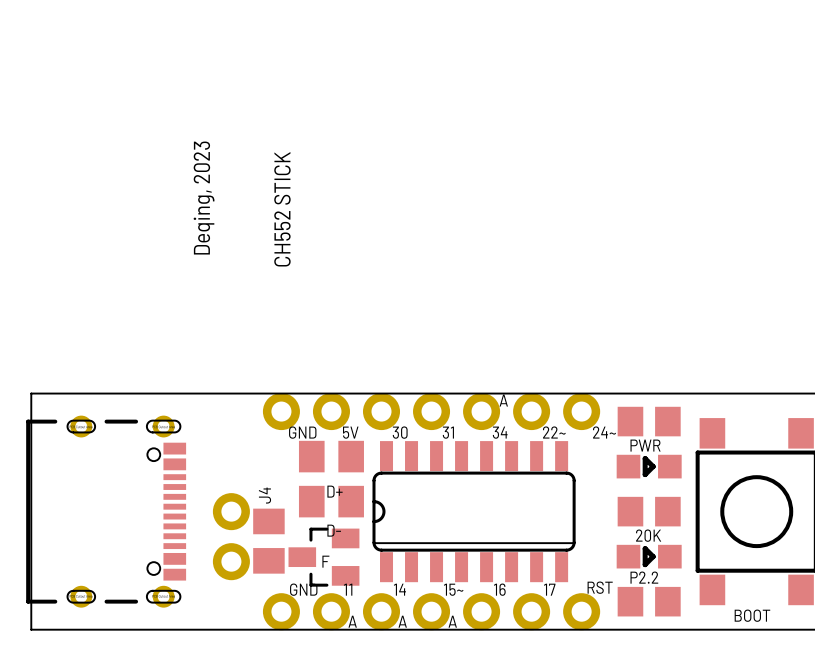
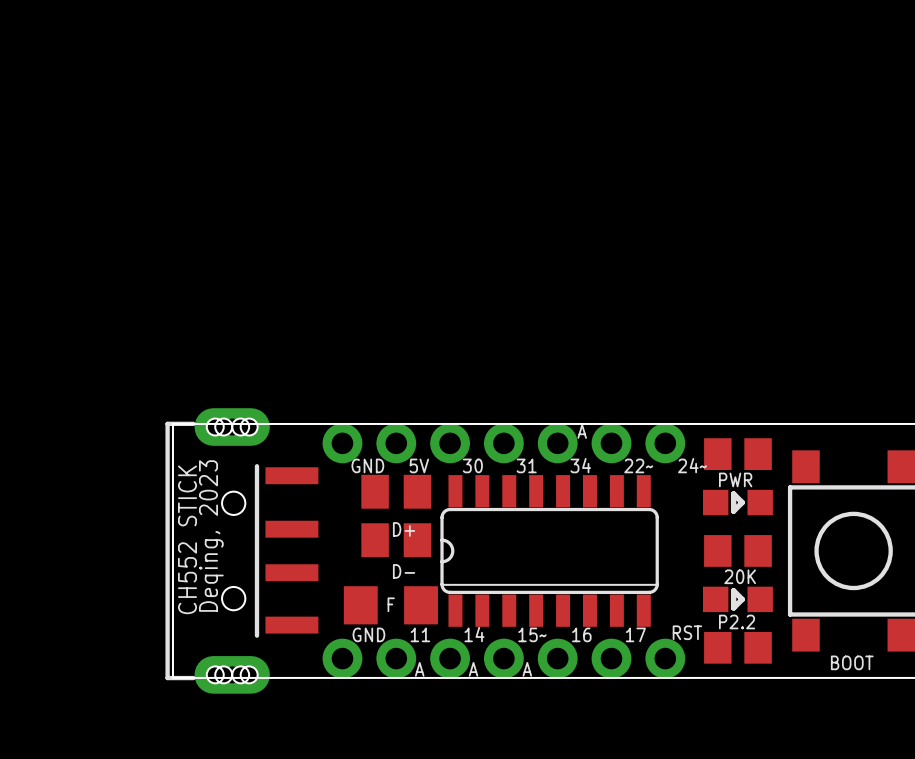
text position: Deqing, 2023 (204, 198) -> Deqing, 2023 (211, 536)
text position: CH552 STICK (282, 209) -> CH552 STICK (187, 539)
board edge: (123, 393) (31, 393) (31, 629) (123, 629) -> (172, 423) (172, 677)
part: (106, 511) -> none
part: none -> (241, 550)
part footprint: [288, 527, 360, 587] -> [343, 586, 438, 625]
J4: (231, 536) -> none
part: (268, 541) -> none

